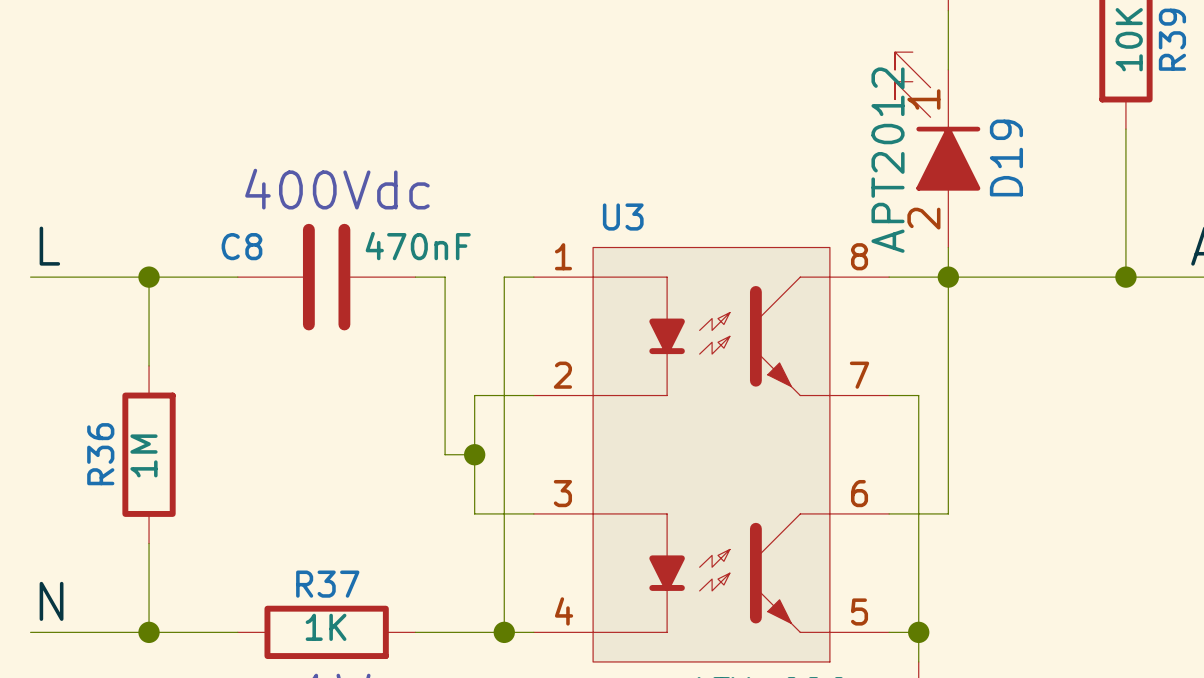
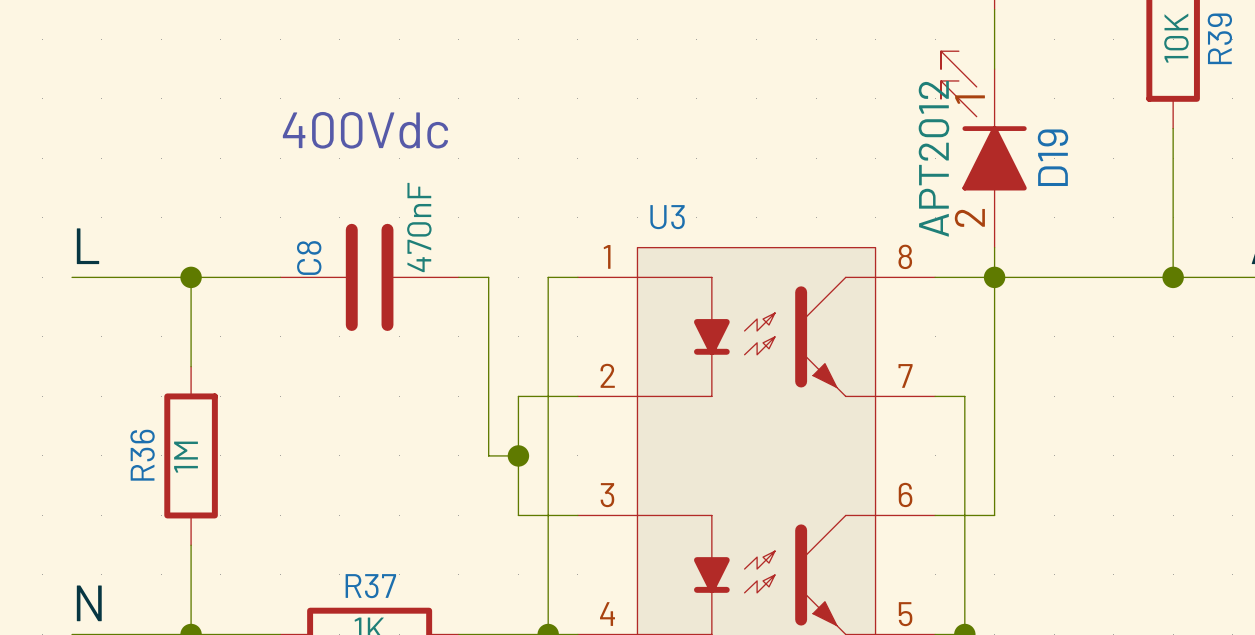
text position: 400Vdc (337, 189) -> 400Vdc (365, 130)
C8 name rotation: 0° (241, 246) -> 90° counterclockwise (309, 258)
C8 value rotation: 0° (418, 246) -> 90° counterclockwise (419, 227)

